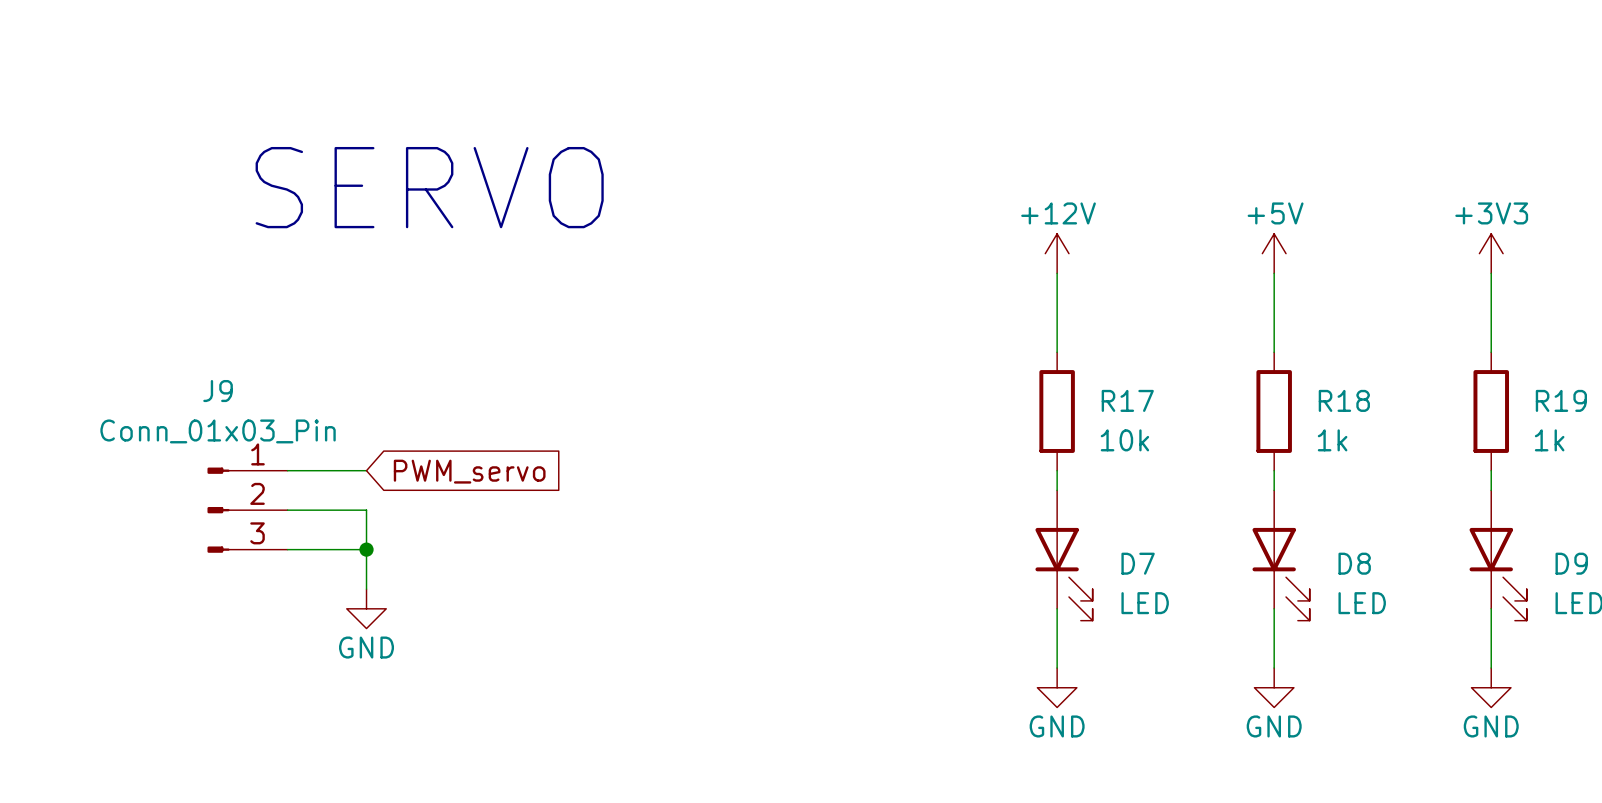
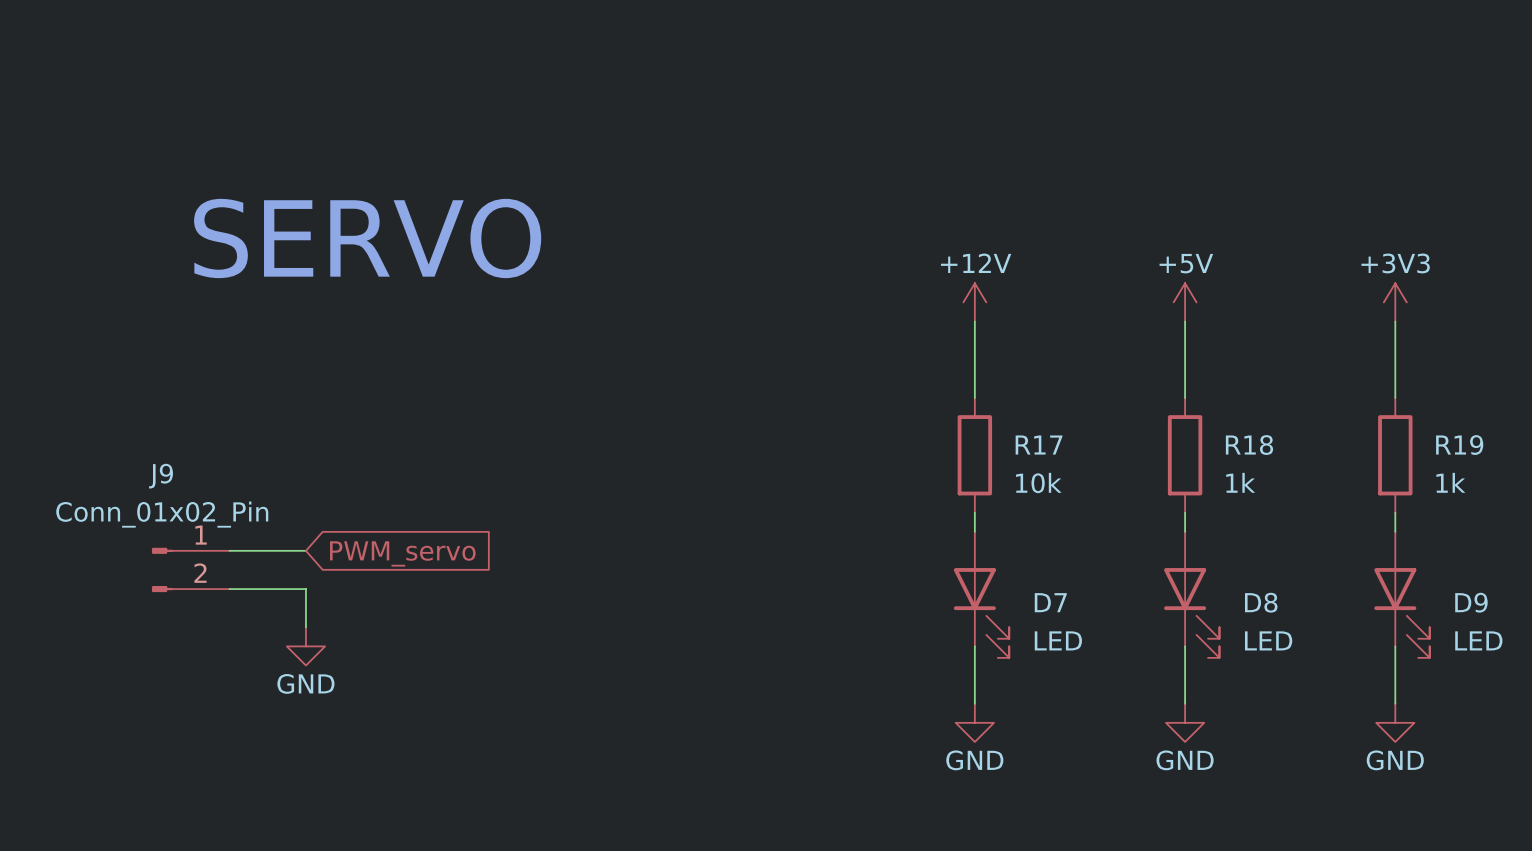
J9 value: Conn_01x03_Pin (218, 431) -> Conn_01x02_Pin (162, 514)
J9 symbol: [207, 467, 288, 553] -> [151, 547, 230, 593]
wire: (287, 470) (366, 470) -> none
global label position: PWM_servo (469, 471) -> PWM_servo (402, 553)
wire: (366, 510) (366, 549) -> none
junction: (366, 549) -> none

